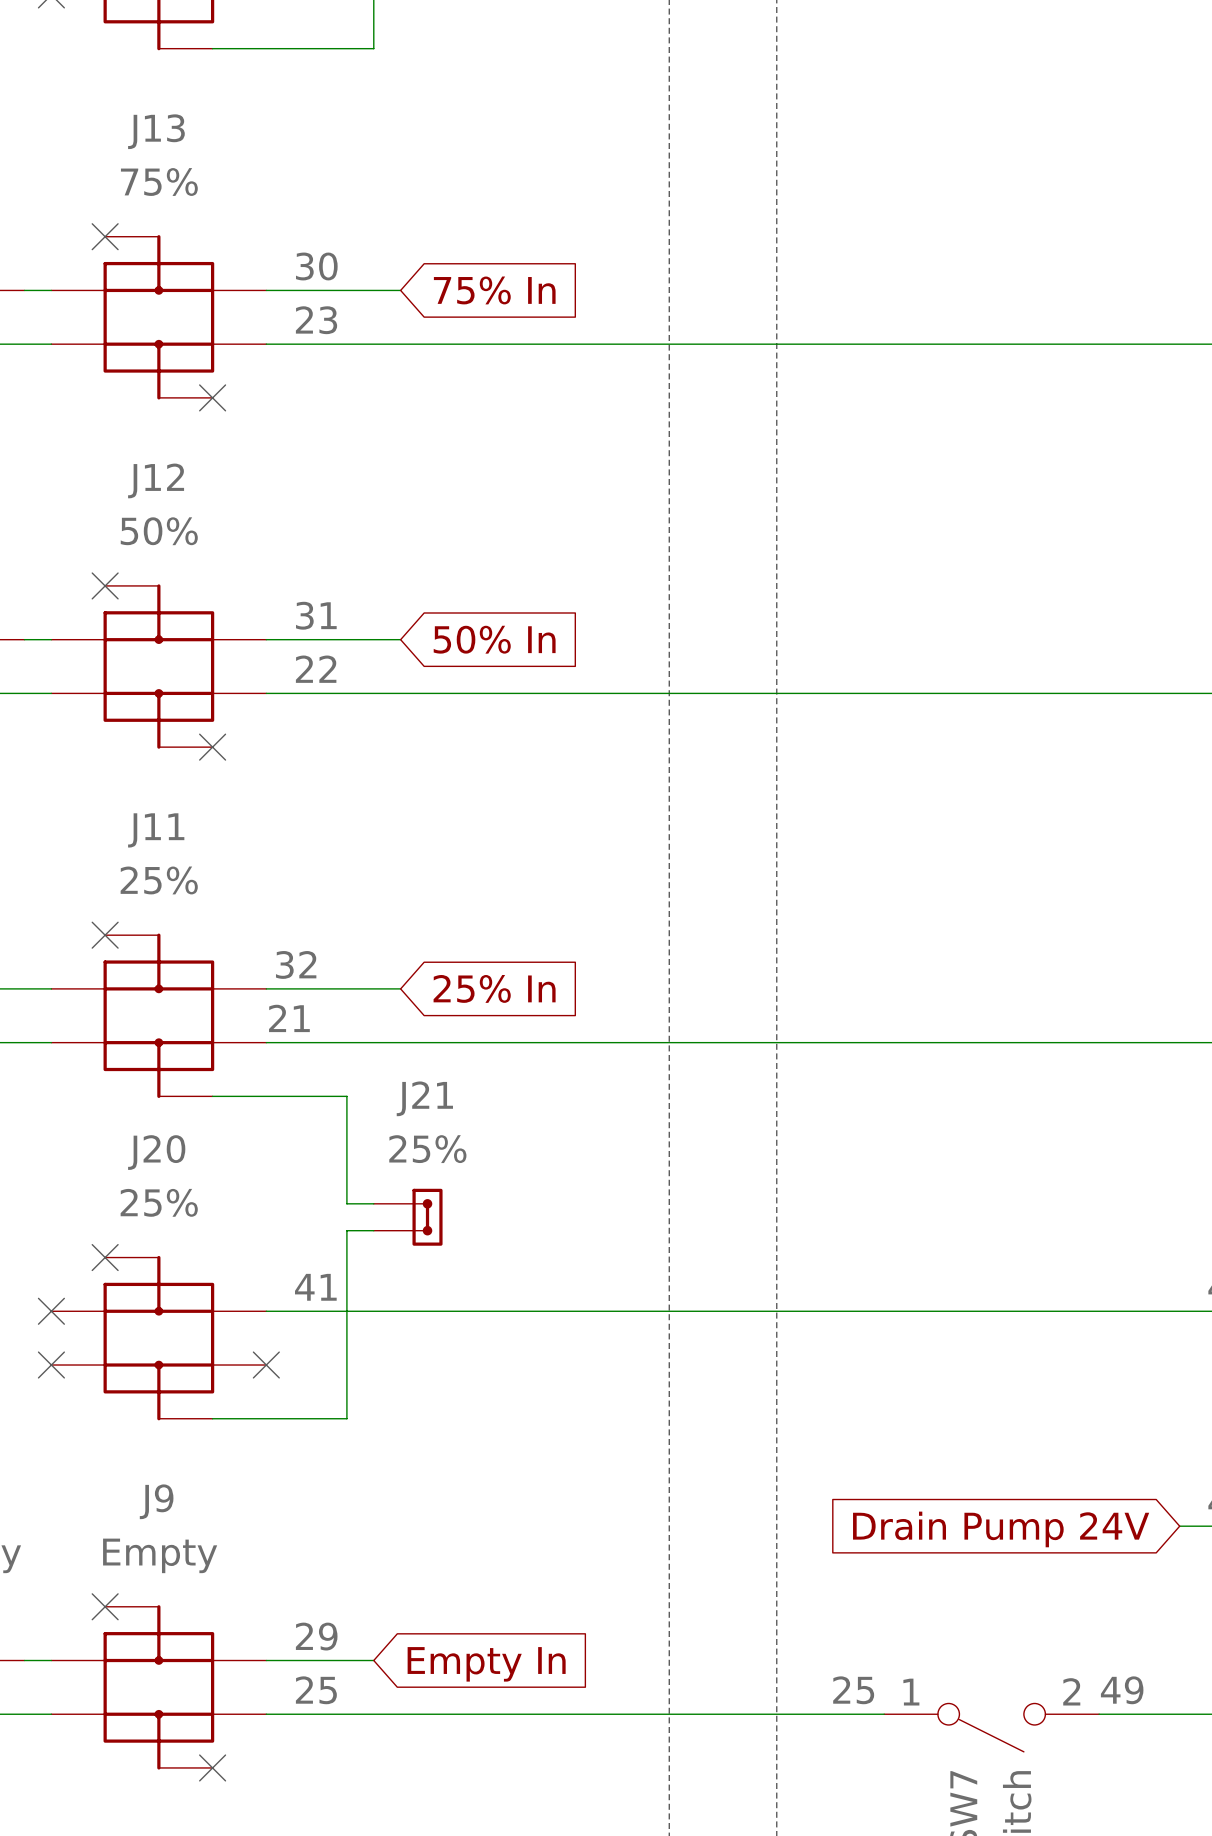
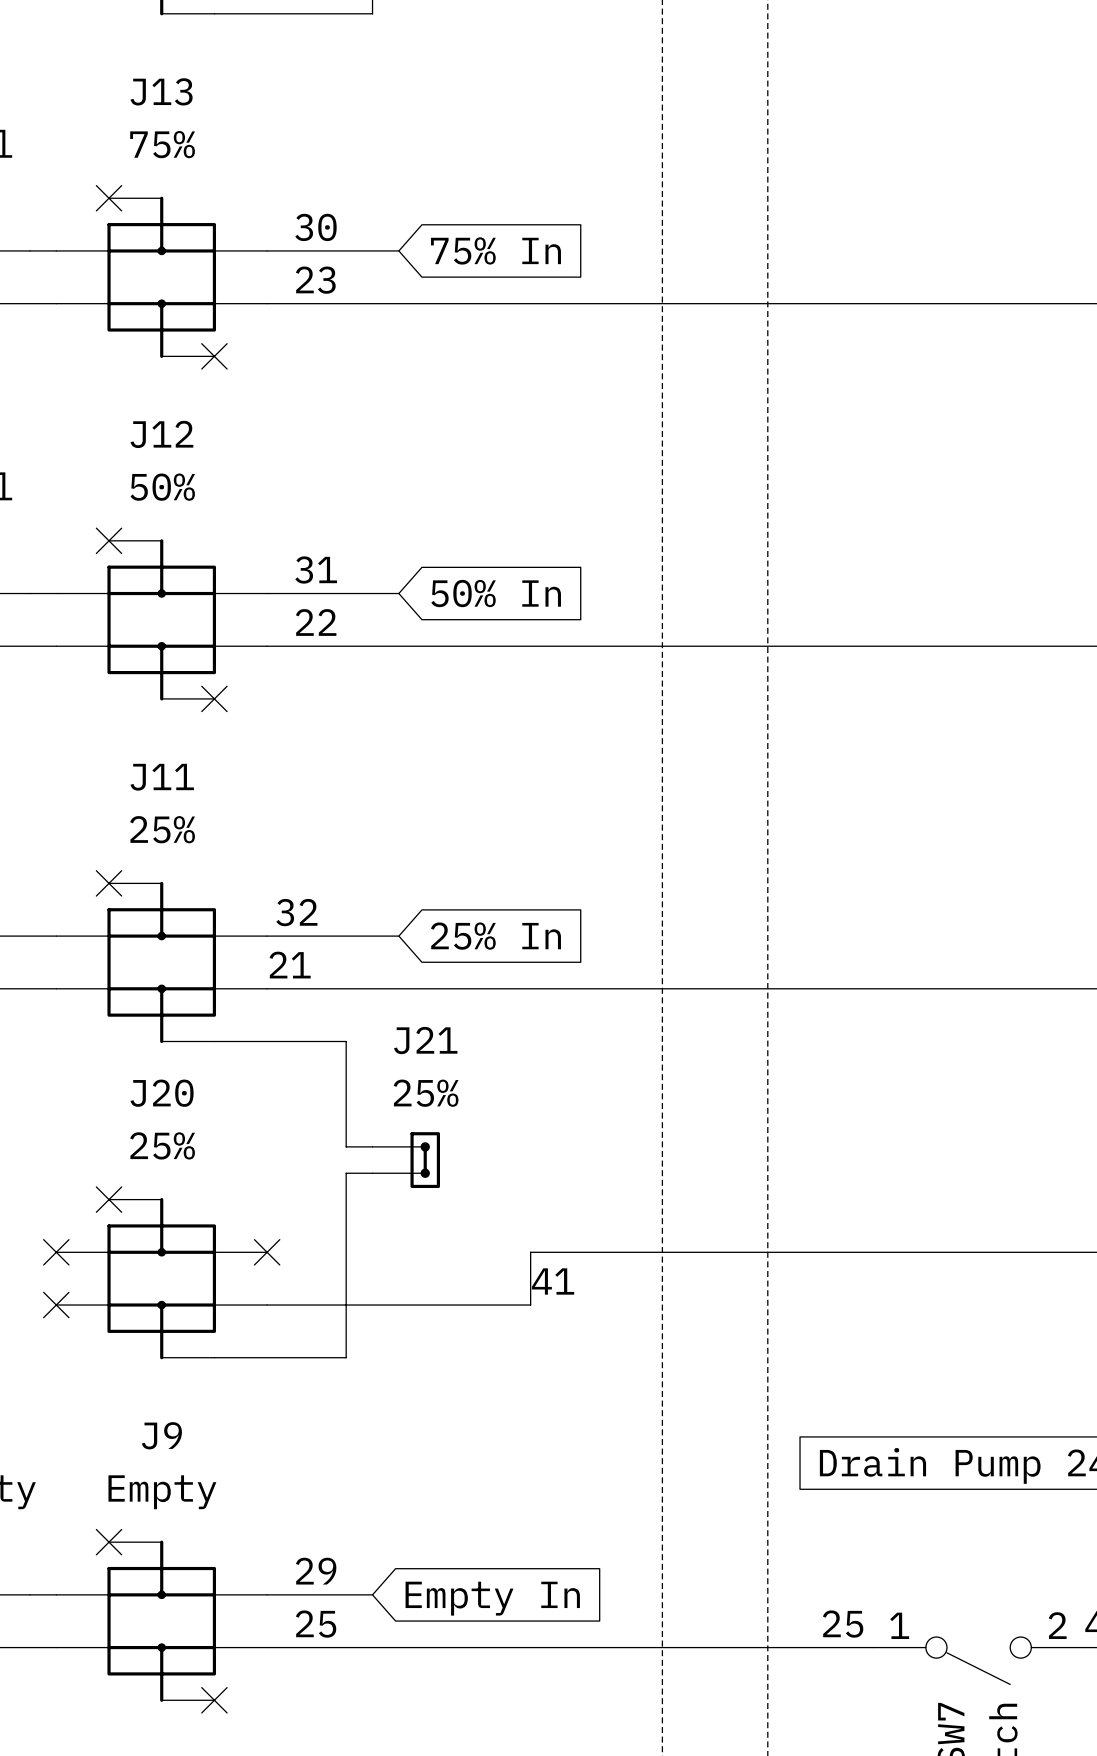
label position: 41 (315, 1287) -> 41 (553, 1281)
wire: (266, 1311) (534, 1311) -> (267, 1305) (530, 1305) (530, 1252)
no-connect mark position: (266, 1365) -> (267, 1252)

